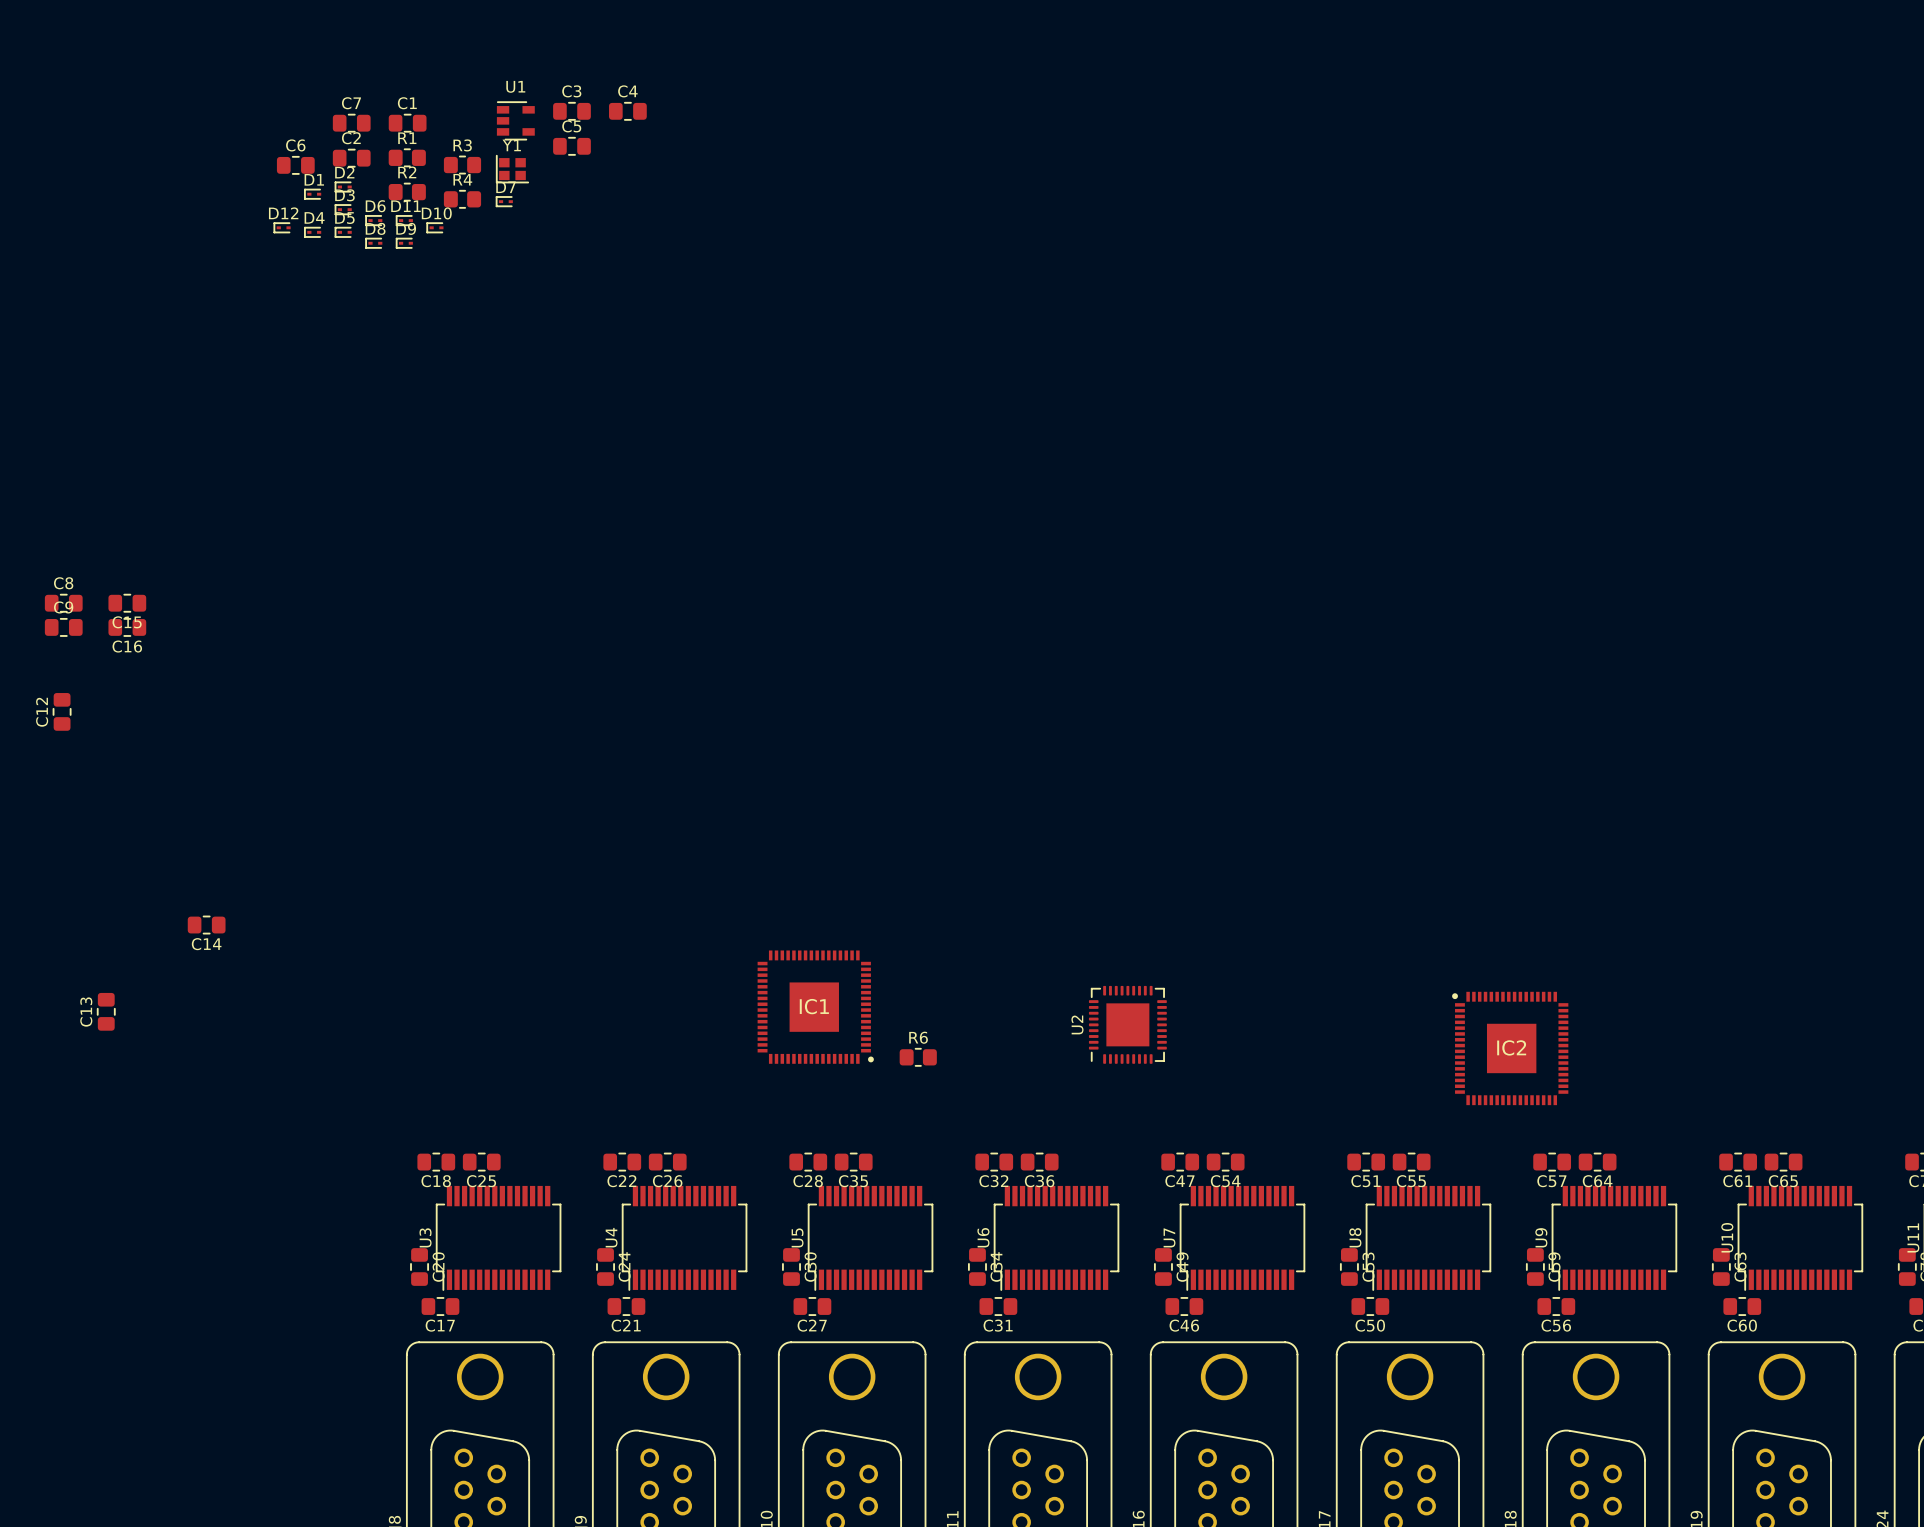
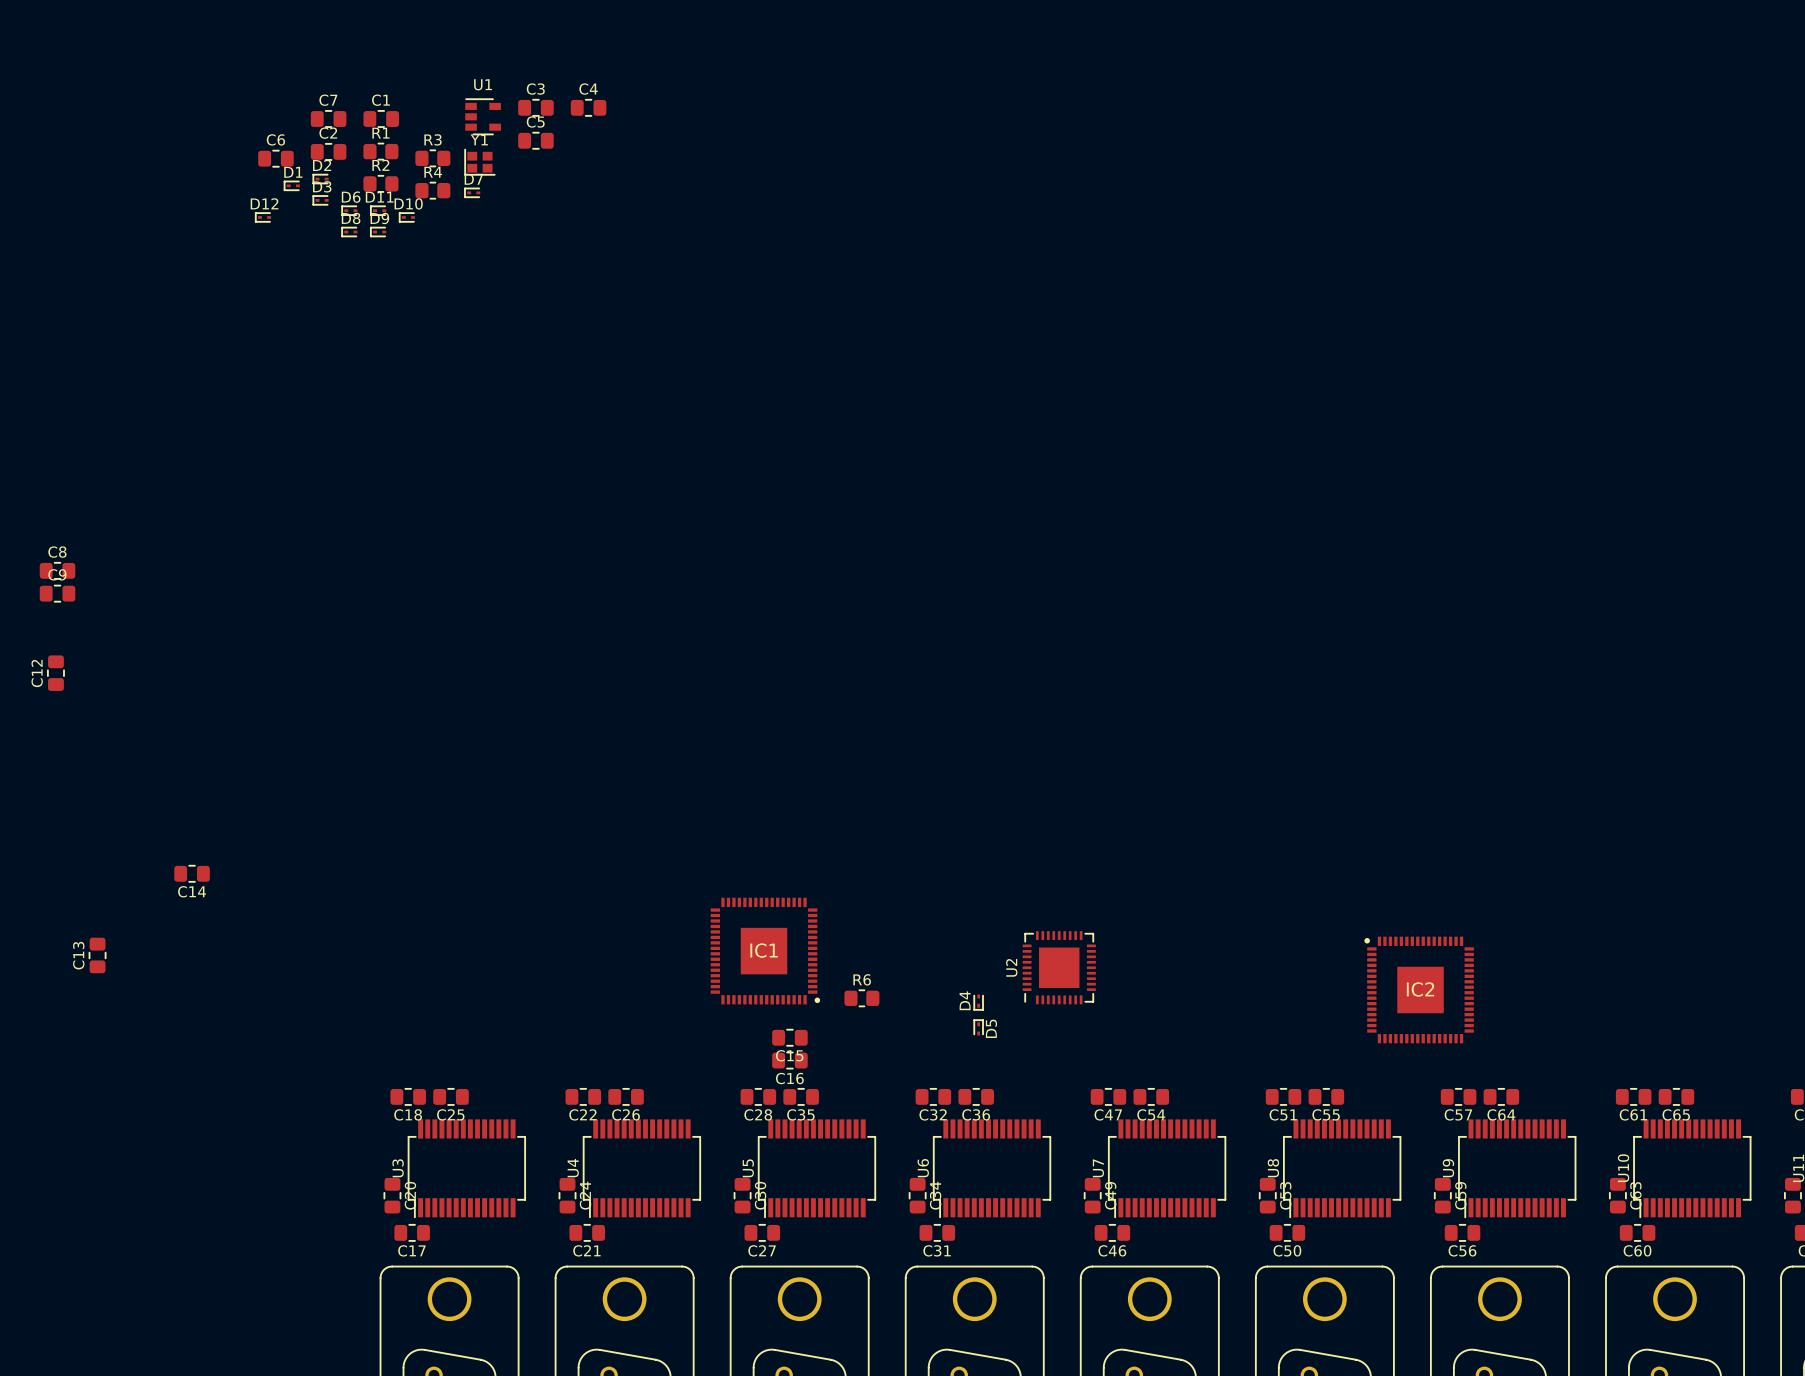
D4 rotation: 0° (312, 232) -> 90° counterclockwise (978, 1002)
D4 position: (312, 232) -> (978, 1002)
D5 rotation: 0° (343, 232) -> 90° clockwise (978, 1027)
D5 position: (343, 232) -> (978, 1027)
C15 position: (127, 603) -> (789, 1037)
C16 position: (127, 627) -> (789, 1060)

